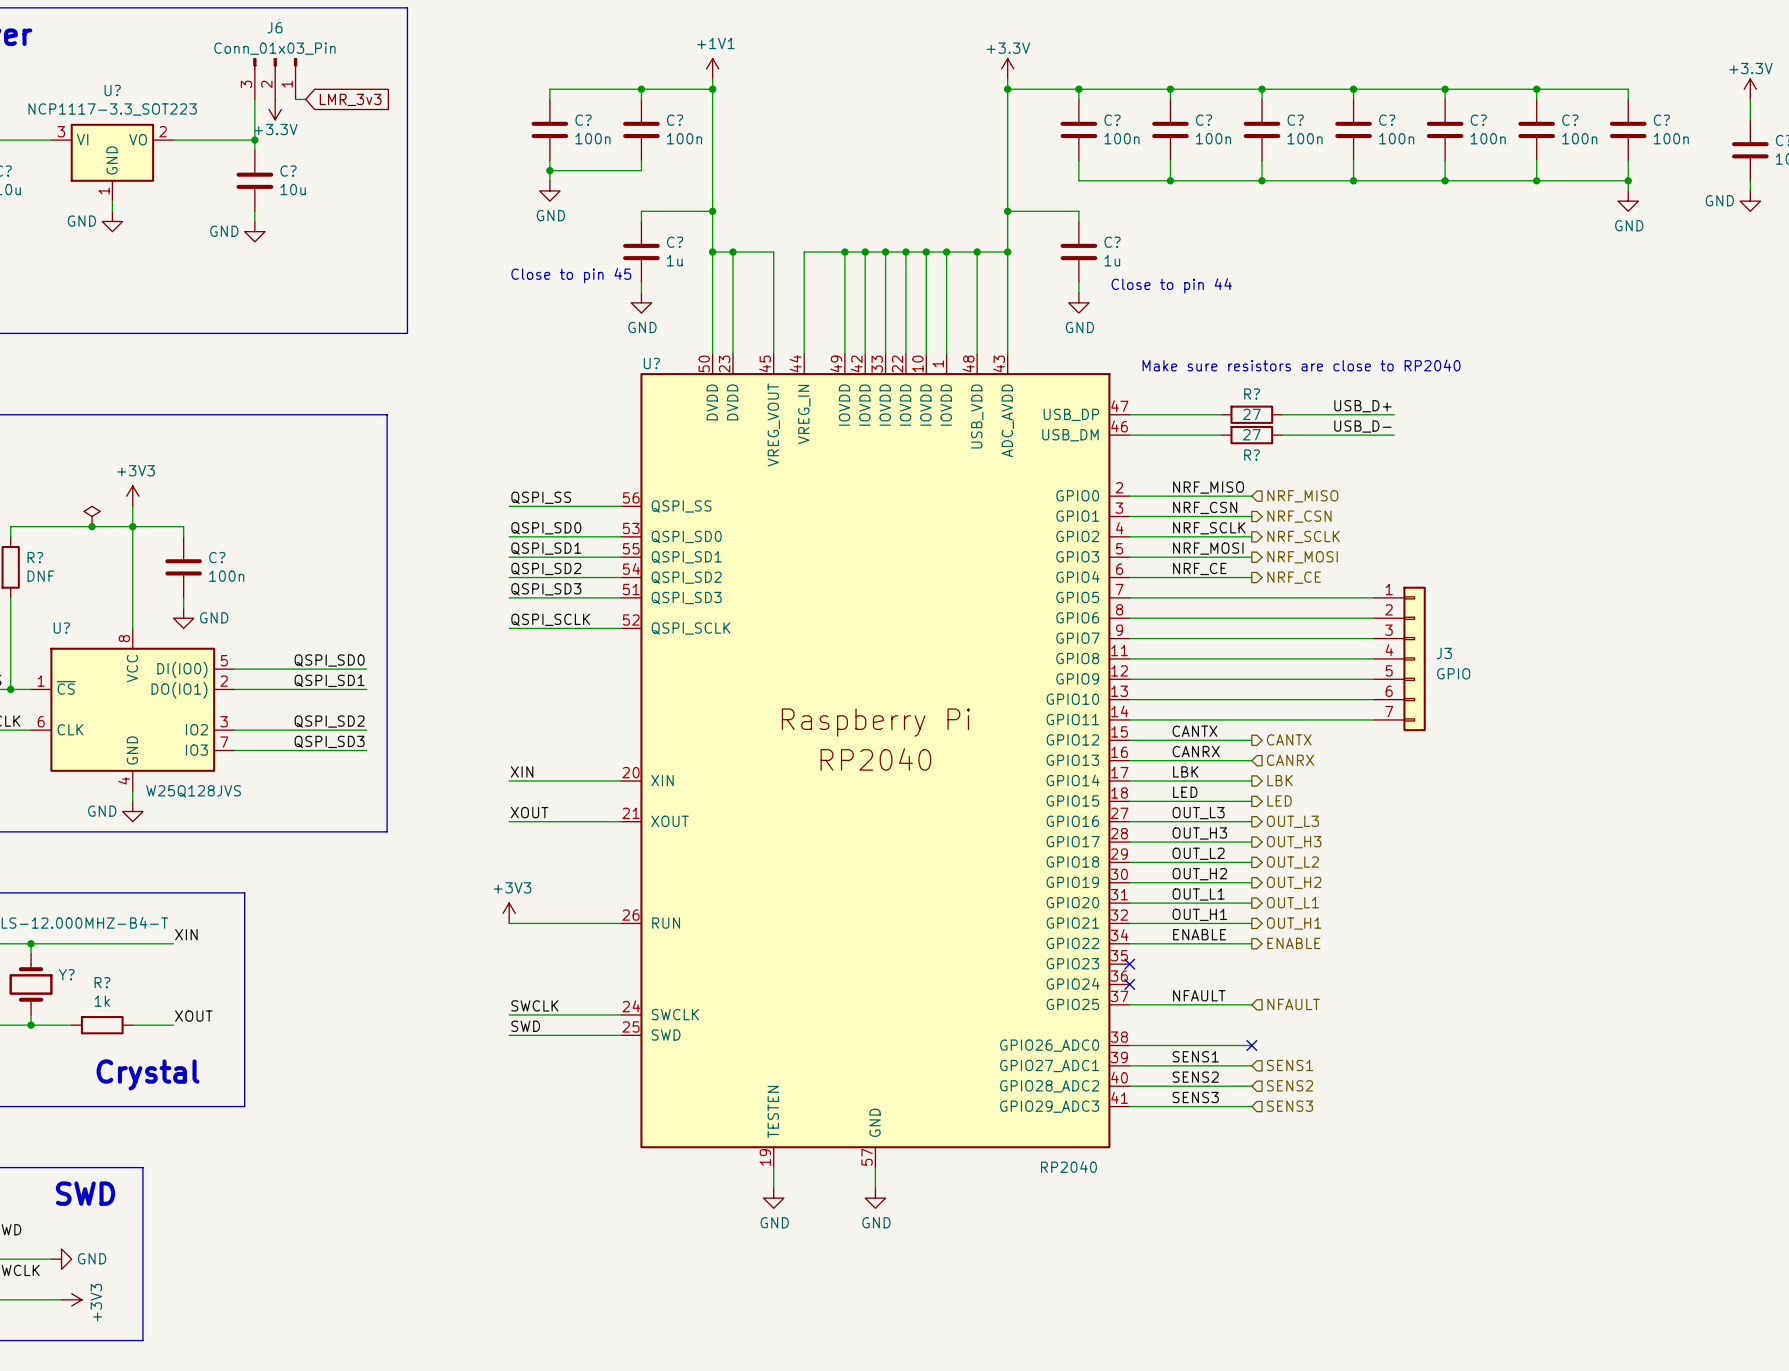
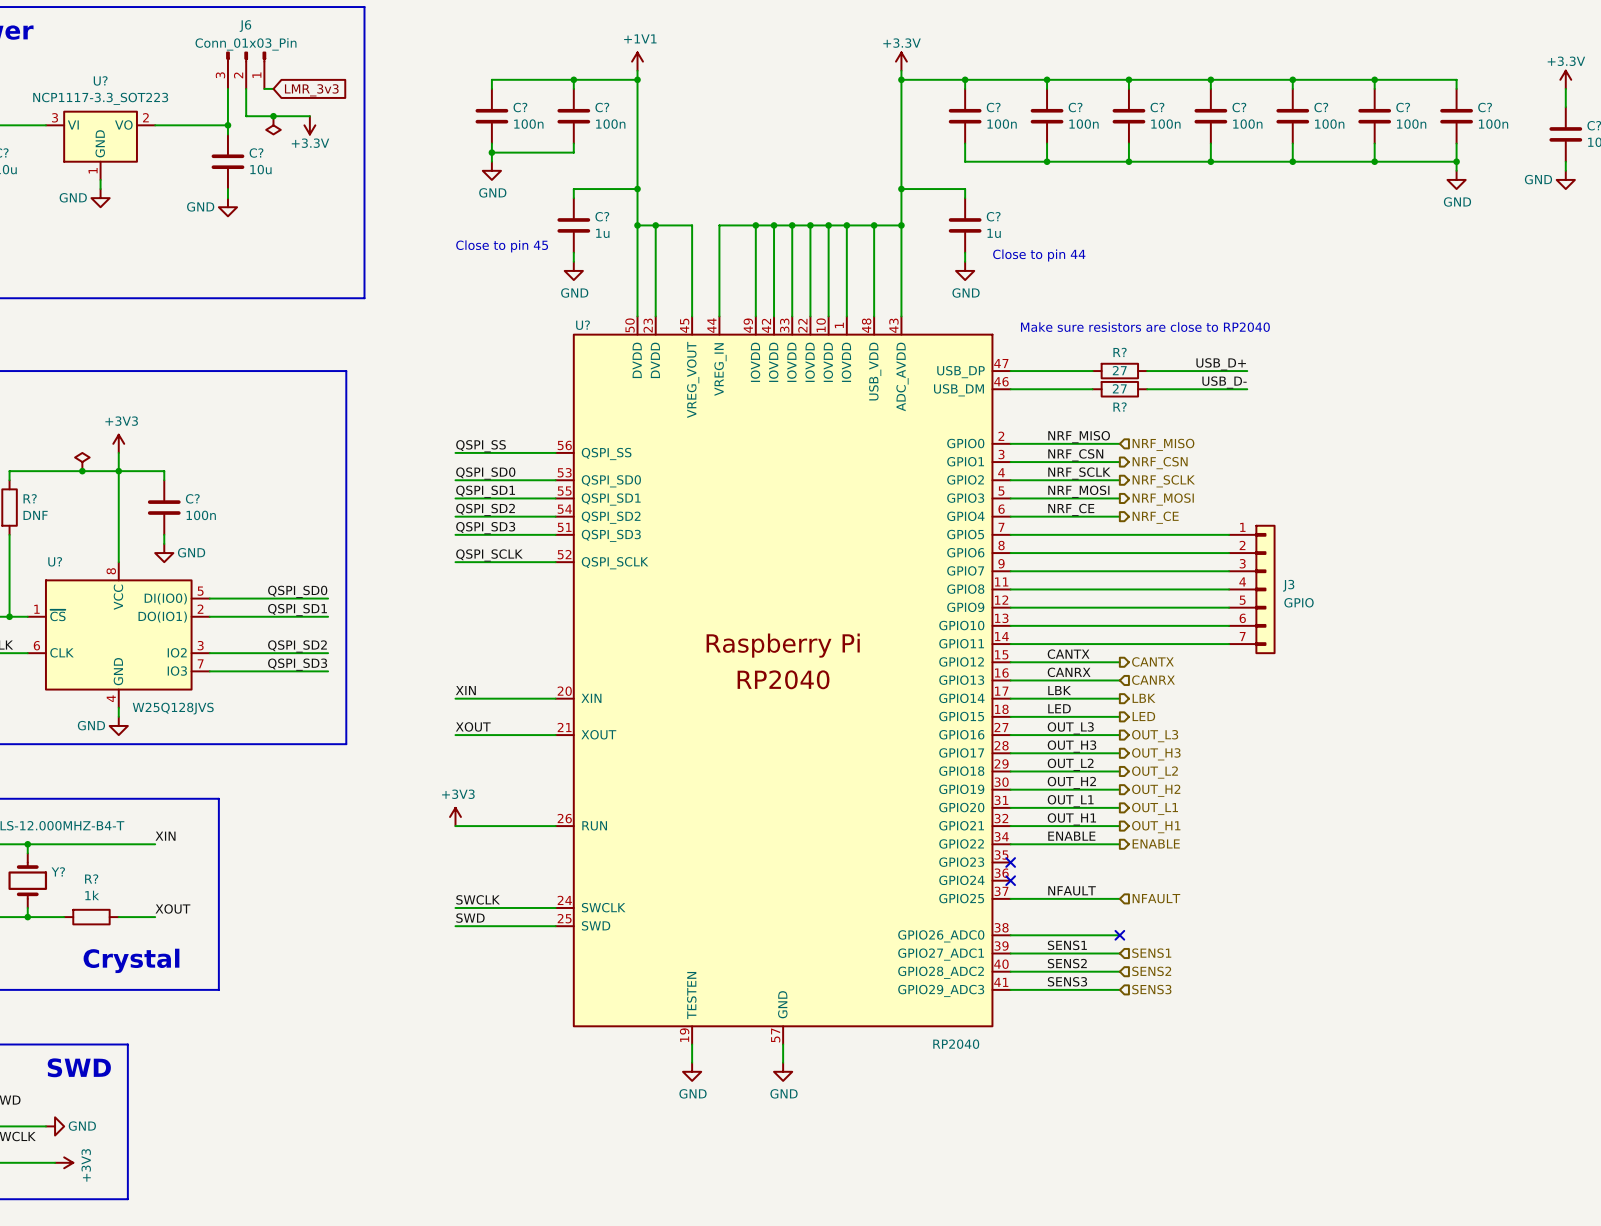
wire: none -> (246, 88) (246, 116) (309, 116)
power symbol position: +3.3V (275, 109) -> +3.3V (309, 125)
junction: none -> (273, 116)
power symbol: none -> (273, 125)

